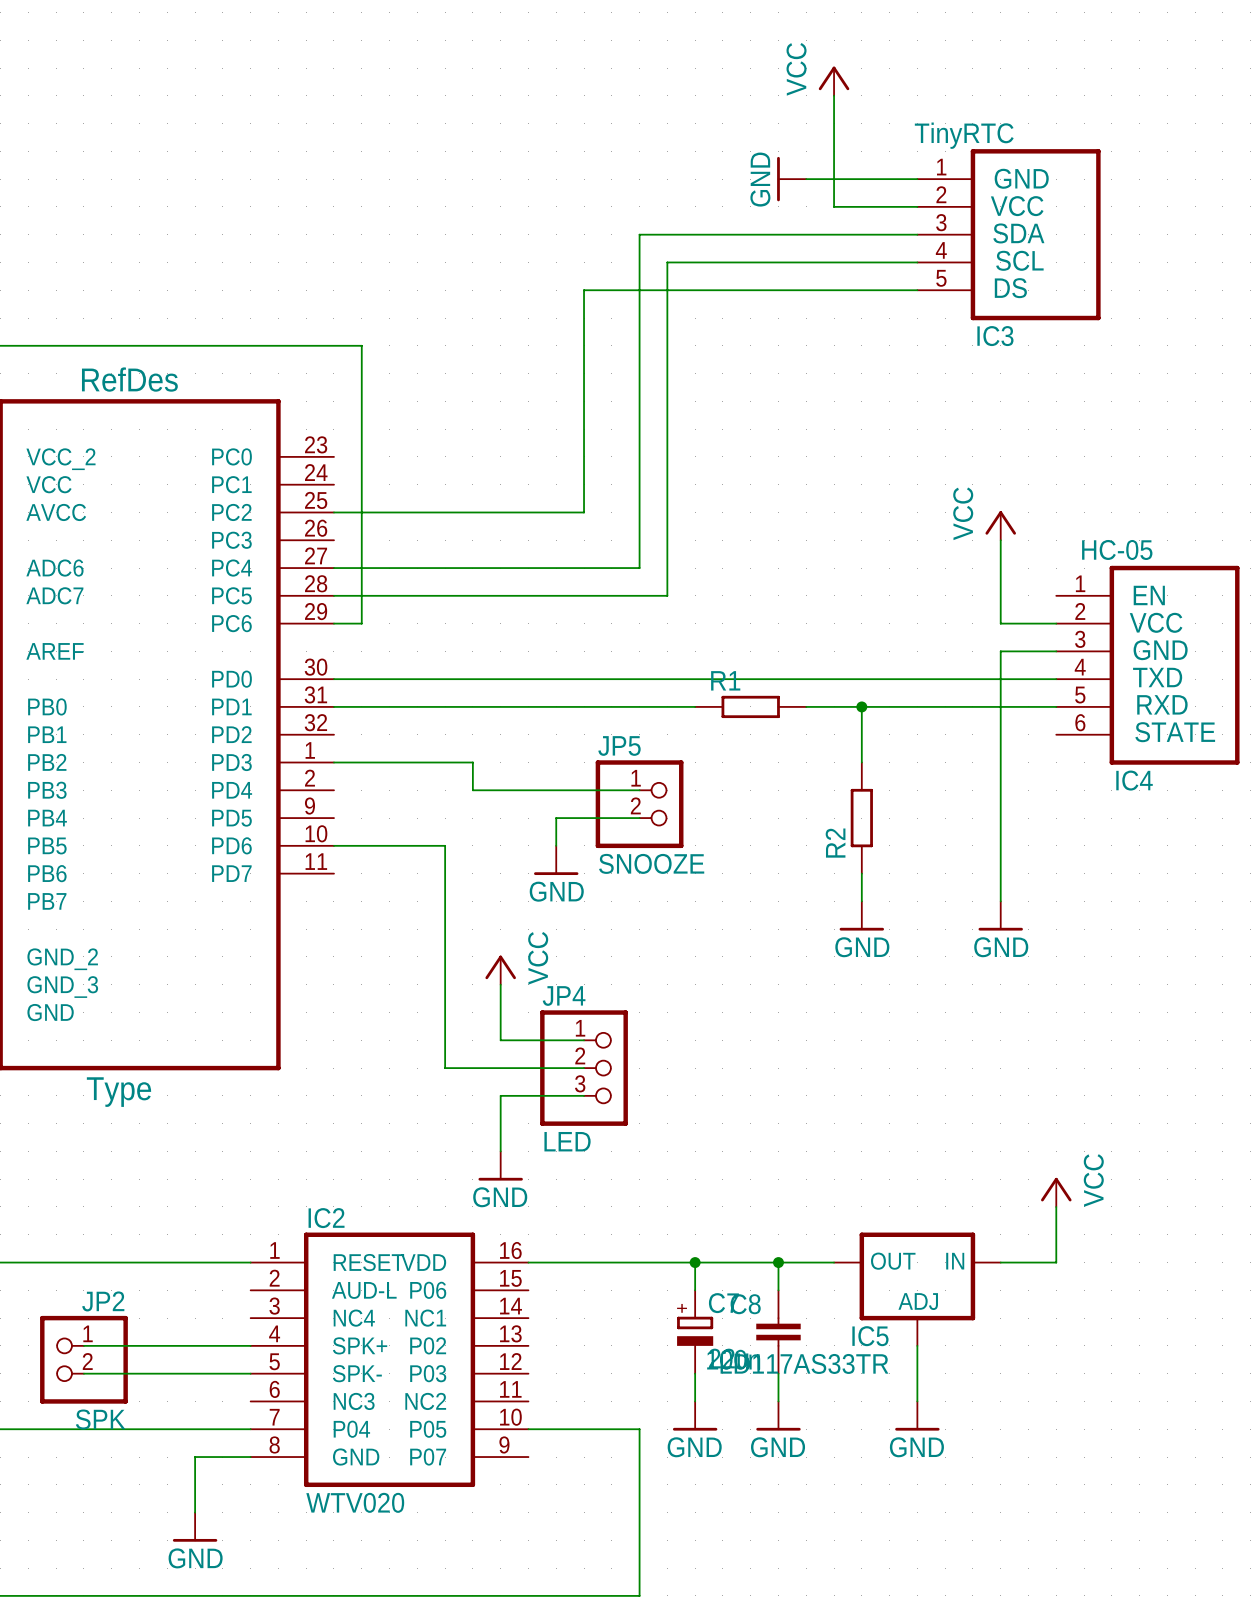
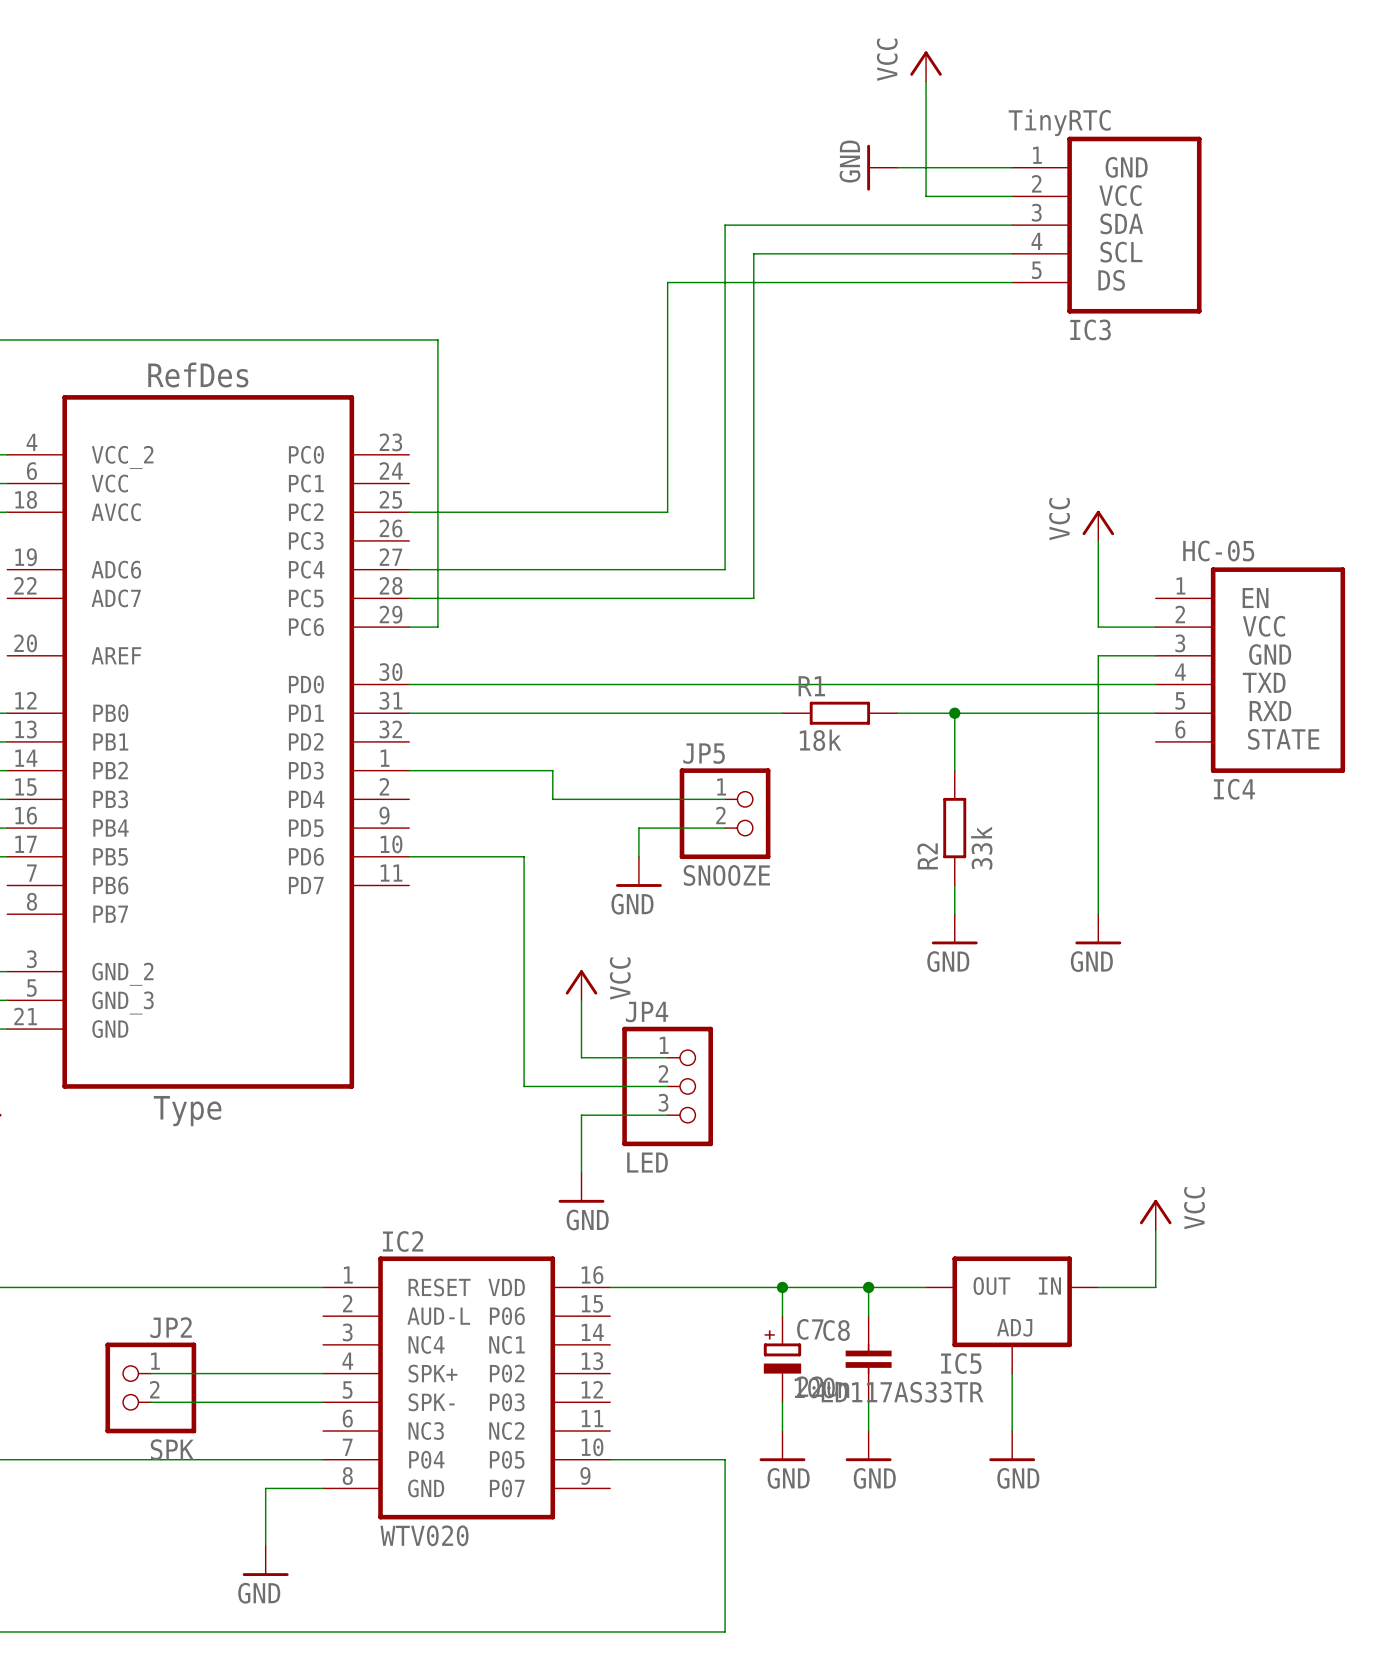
R1 value: none -> 18k (820, 740)
R2 value: none -> 33k (981, 848)

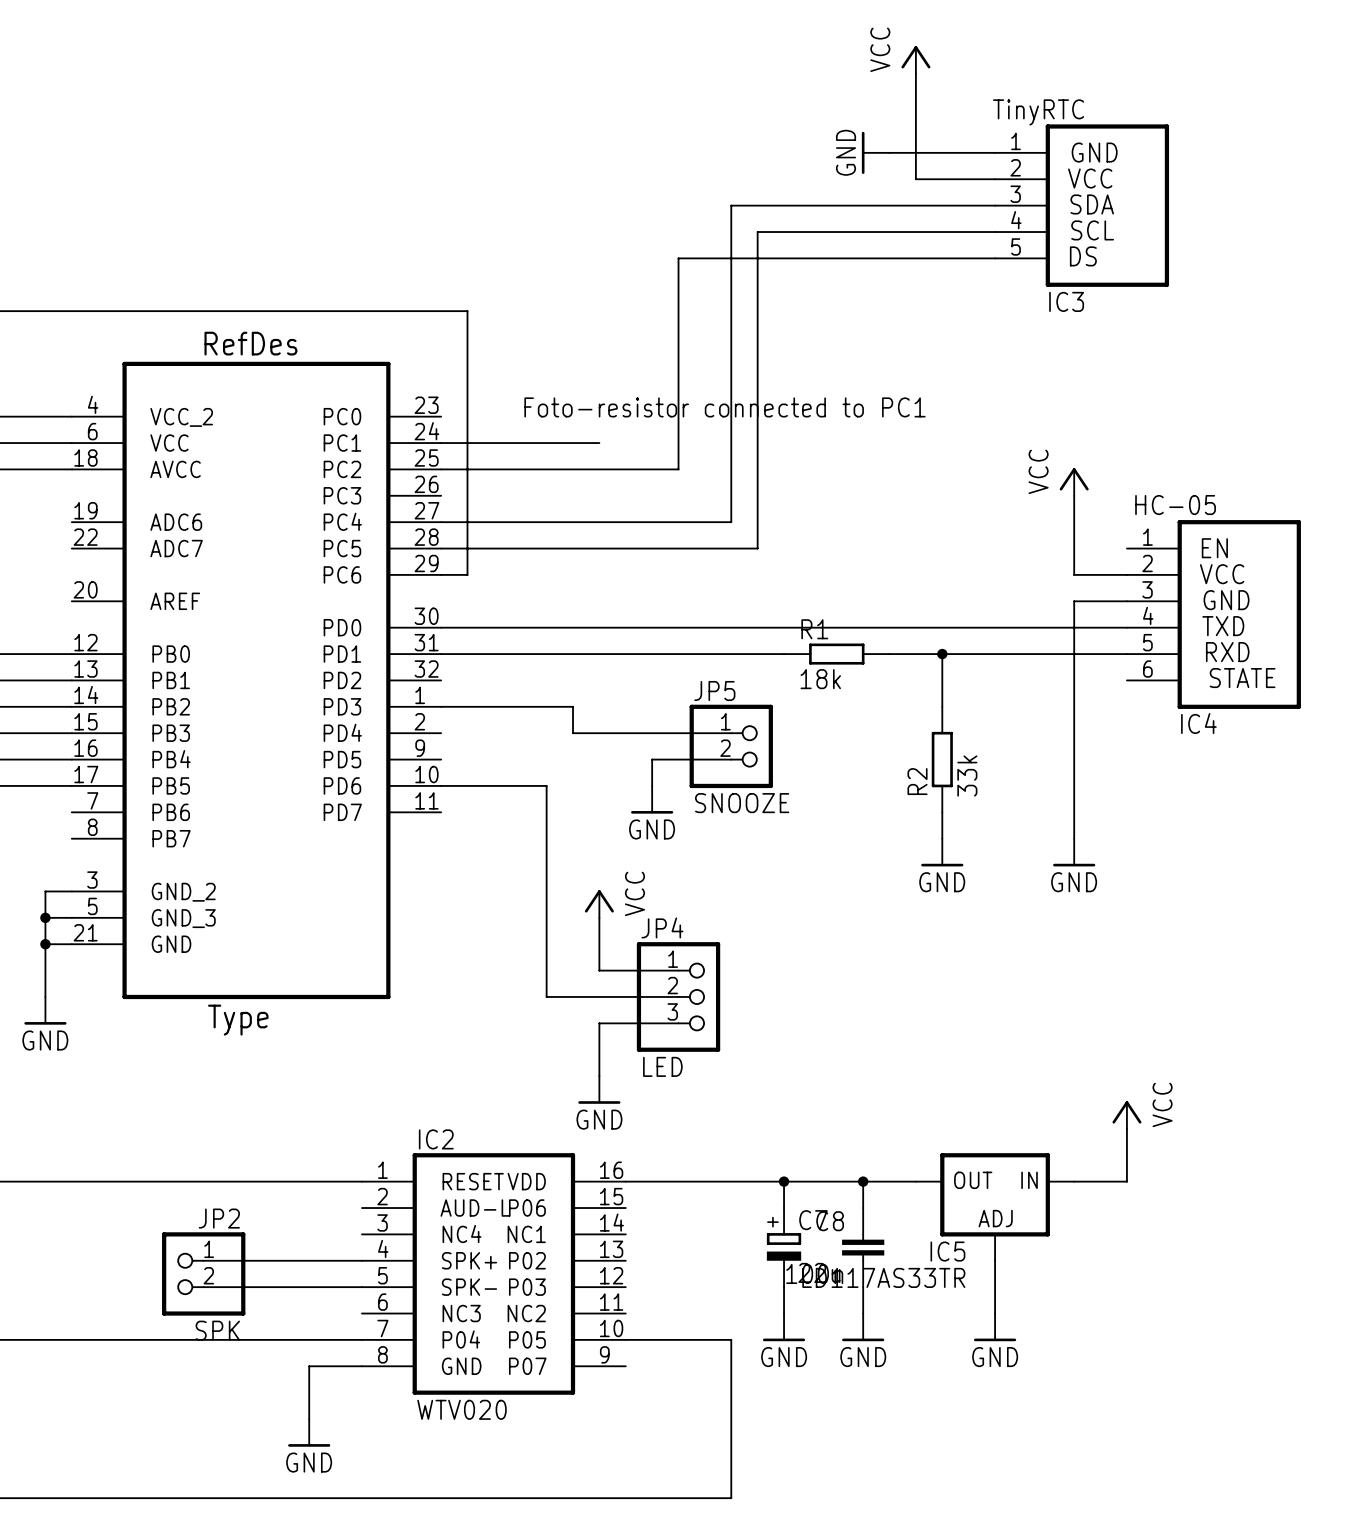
text: none -> Foto-resistor connected to PC1 (724, 407)
wire: none -> (441, 443) (599, 443)

